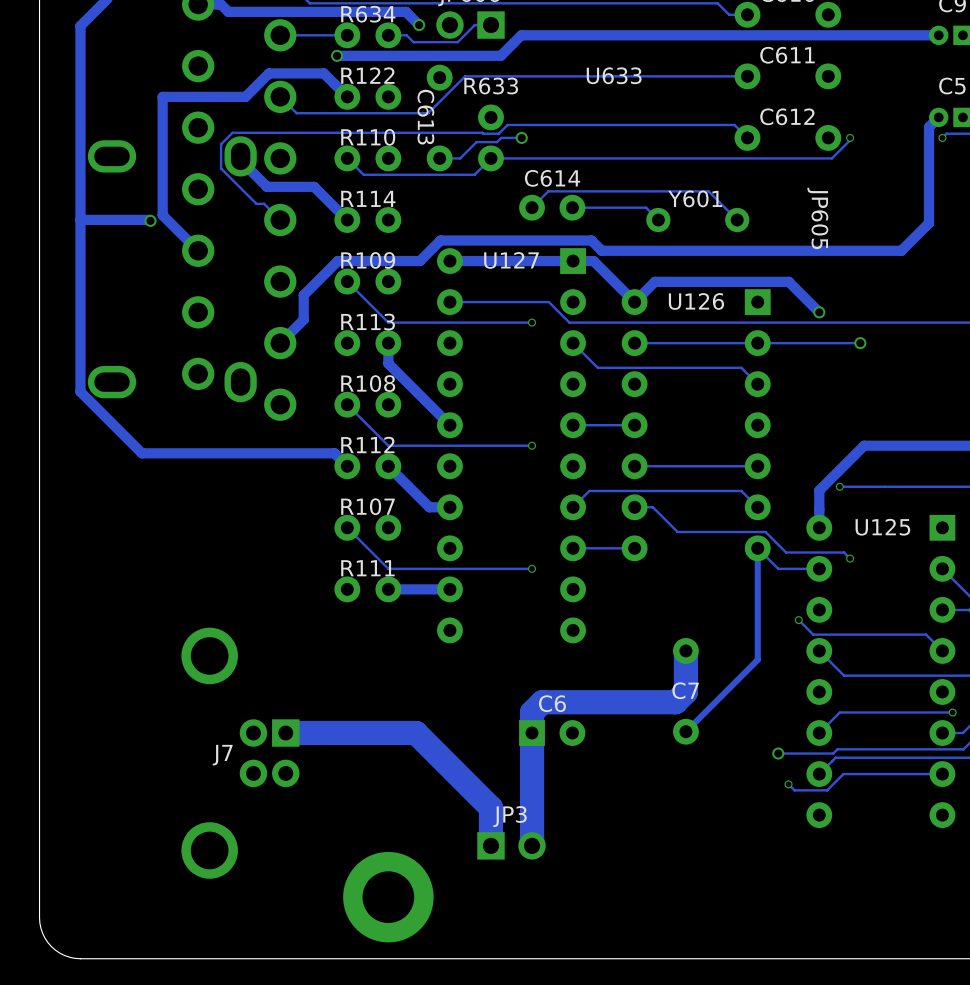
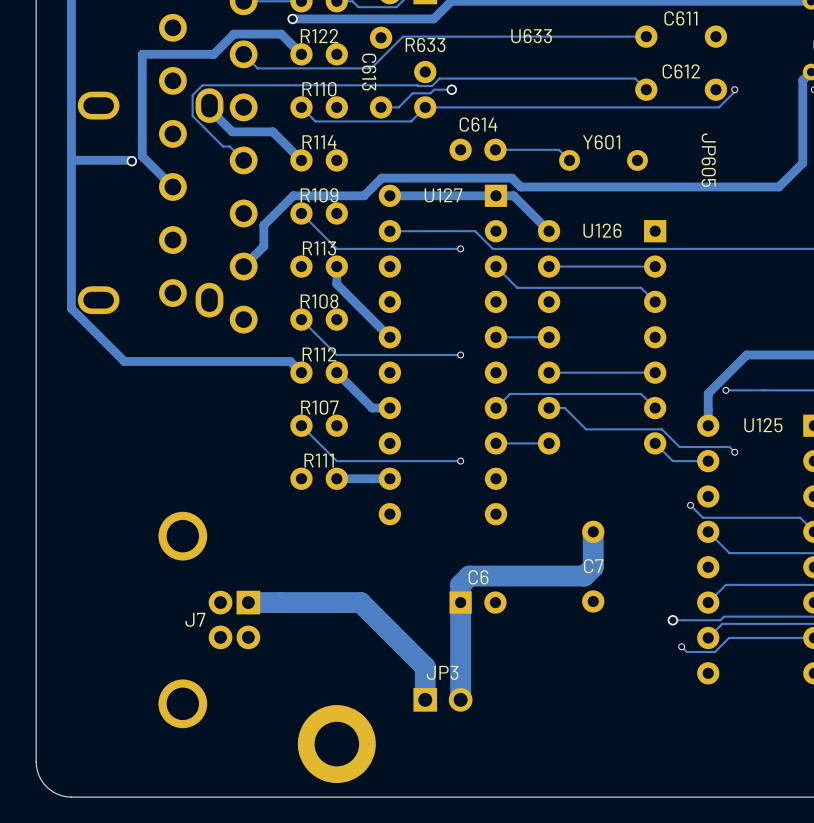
track: (532, 207) (548, 191) (708, 191) (737, 220) -> none
track: (634, 302) (654, 281) (788, 281) (819, 312) -> none
via: (819, 312) -> none
track: (860, 343) (757, 343) -> none
via: (860, 343) -> none
track: (757, 548) (757, 659) (685, 731) -> none

